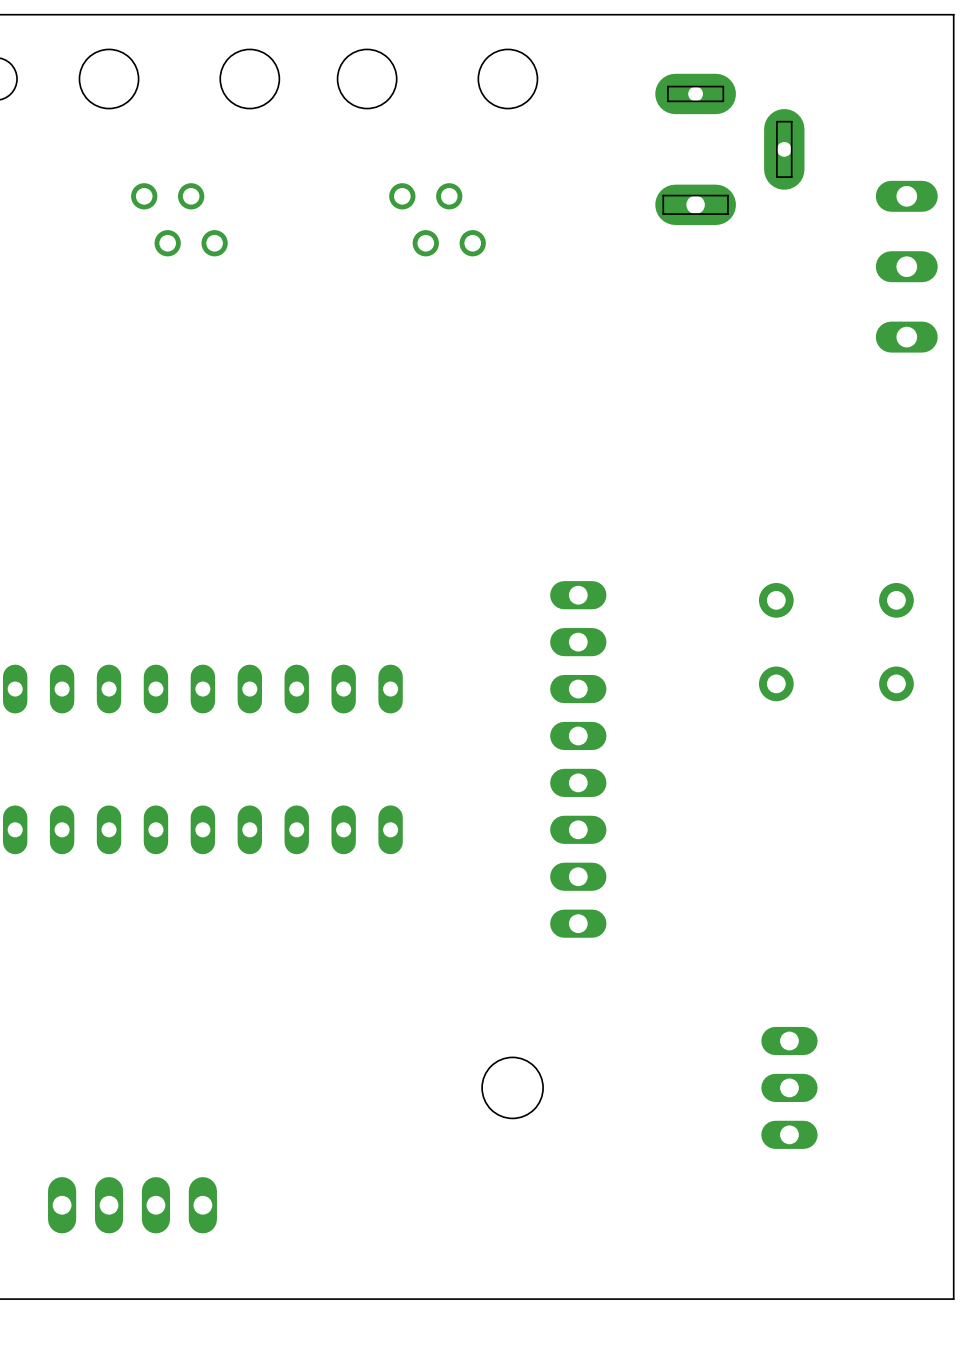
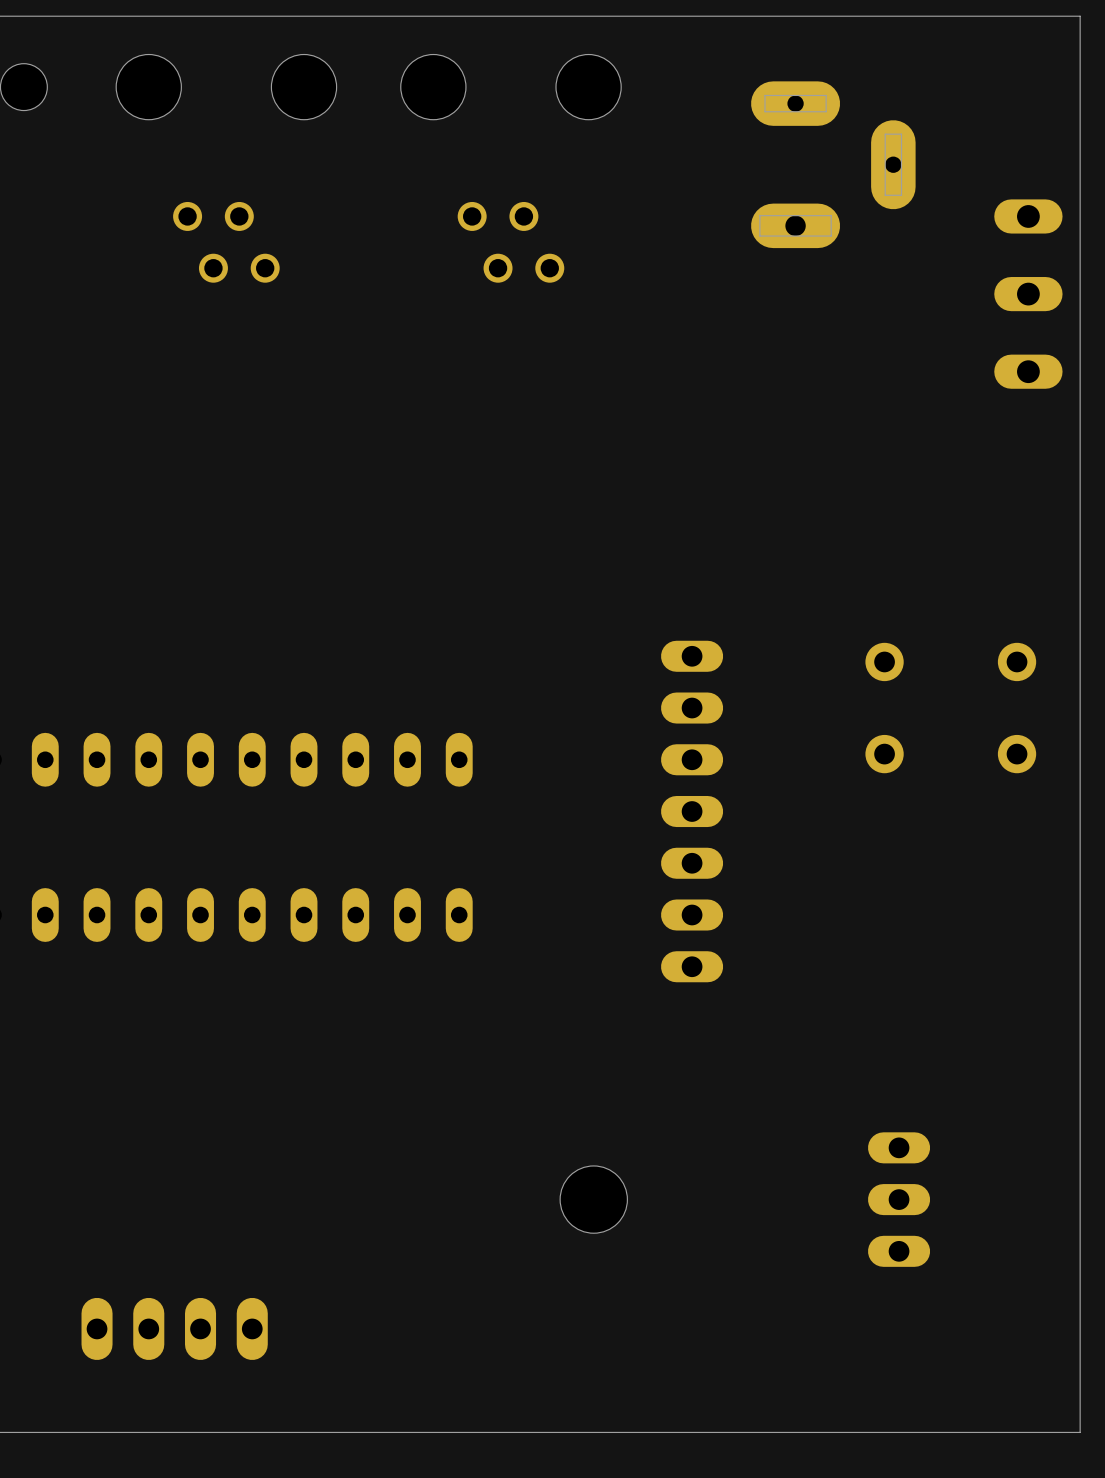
part: none -> (692, 811)
part: (578, 759) -> none

